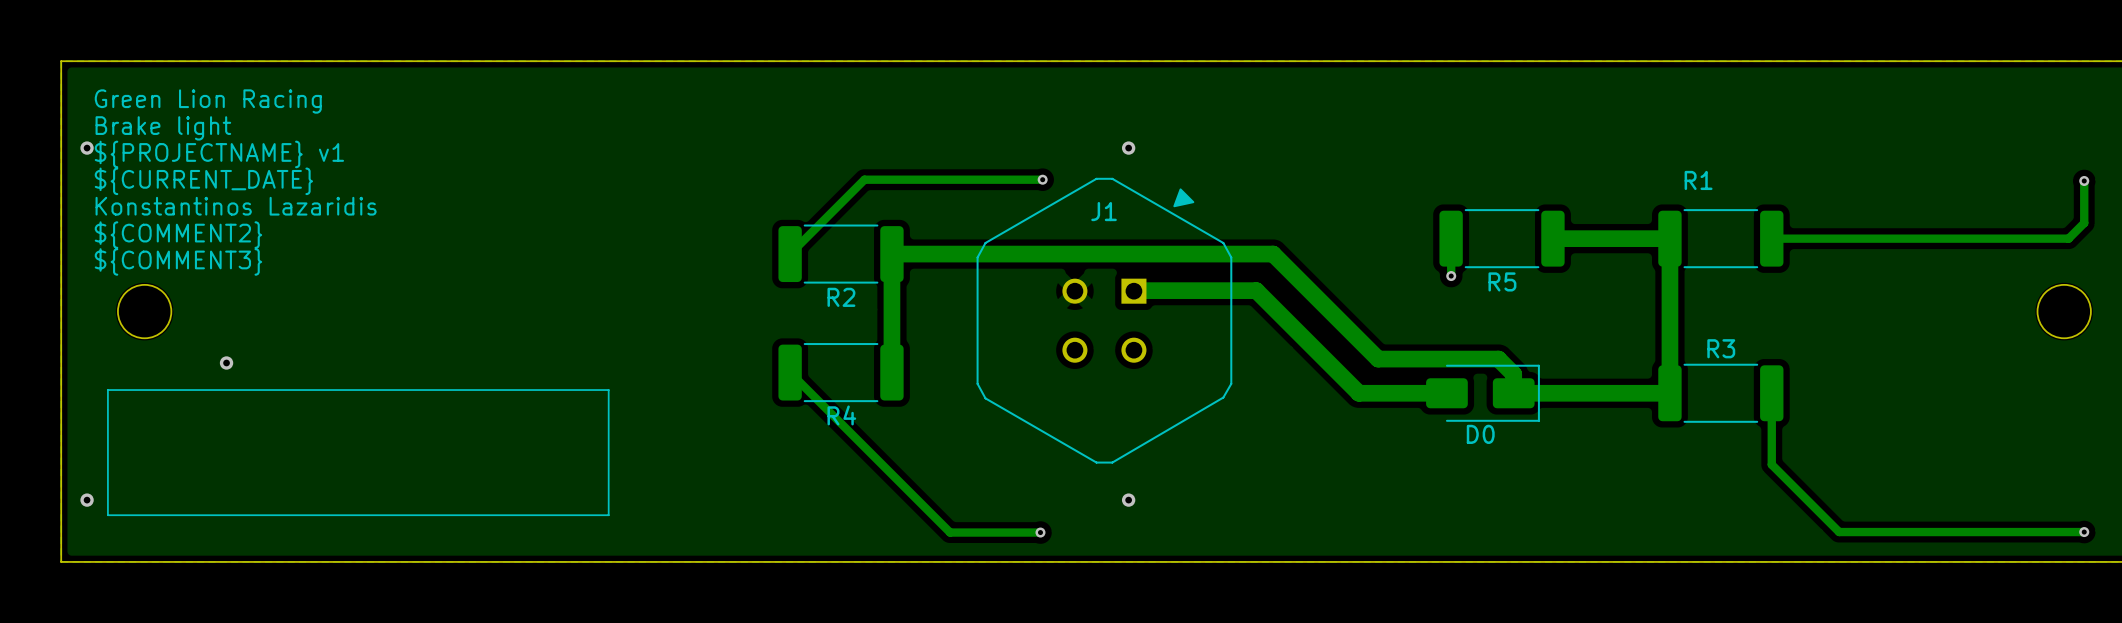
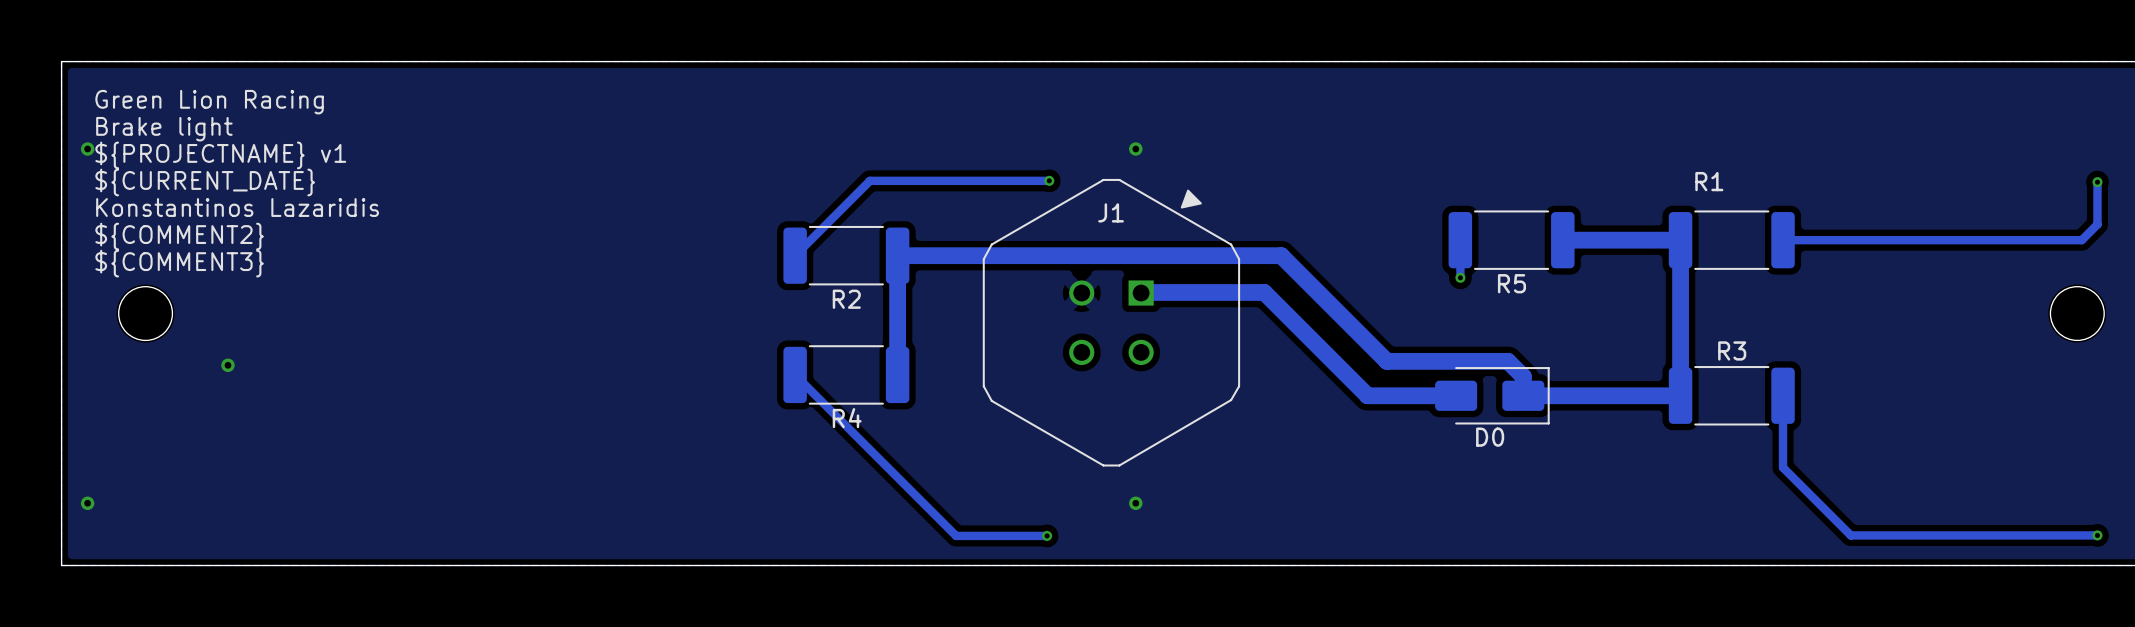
line: (608, 390) (107, 390) (107, 515) (608, 515) (608, 390) -> none

